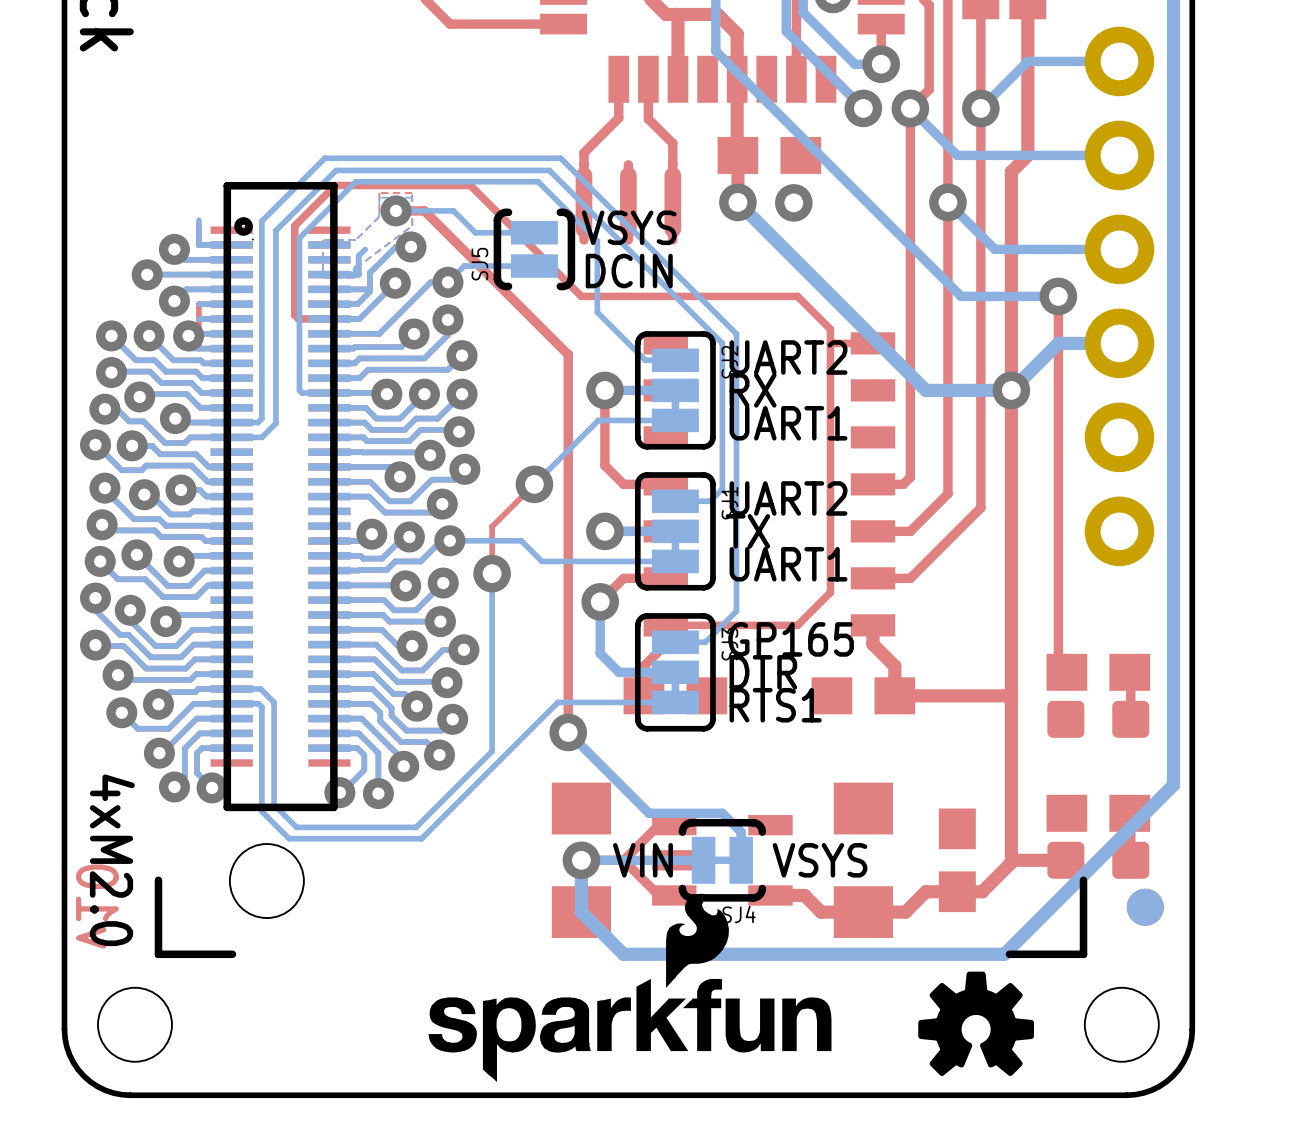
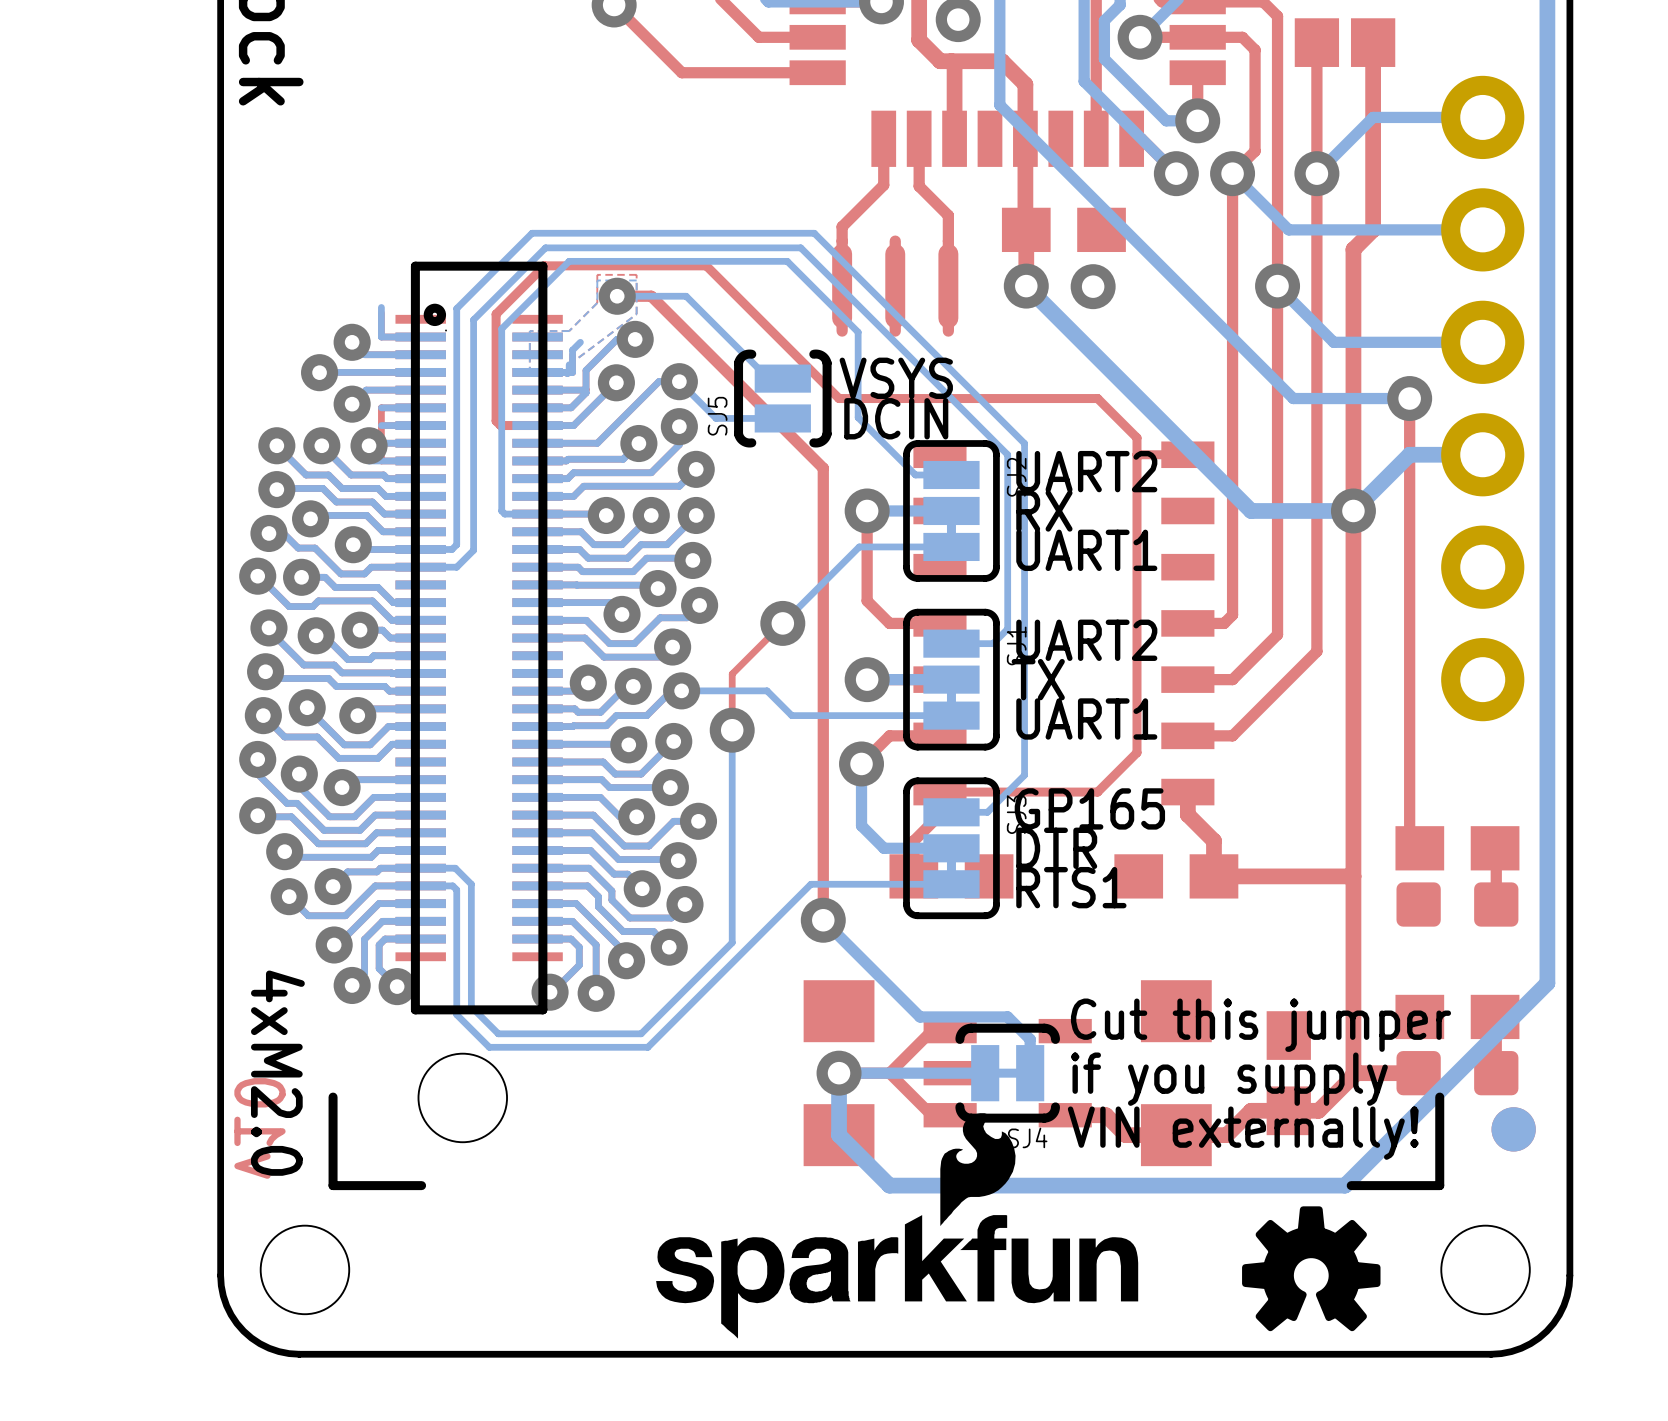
text: VSYS (629, 227) -> none
bottom track: (534, 232) (475, 232) -> (782, 378) (768, 378) (712, 322)
SJ5 position: (534, 249) -> (782, 398)
bottom track: (534, 266) (464, 266) (447, 282) -> (782, 418) (716, 418) (679, 381)
text: DCIN (629, 271) -> VSYS (896, 378)
text: none -> DCIN (896, 418)
text: none -> Cut this jumper (1260, 1025)
text: VIN (642, 860) -> none
text: VSYS (820, 860) -> if you supply (1229, 1079)
text: none -> VIN externally! (1243, 1133)

